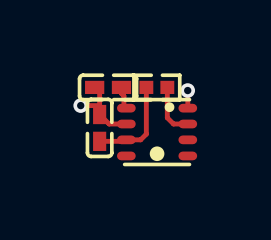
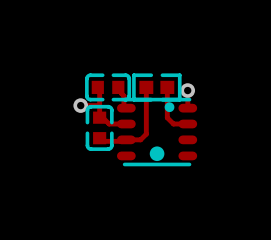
part footprint: [77, 73, 139, 102] -> [85, 73, 132, 102]
part footprint: [85, 97, 114, 159] -> [85, 104, 114, 151]

